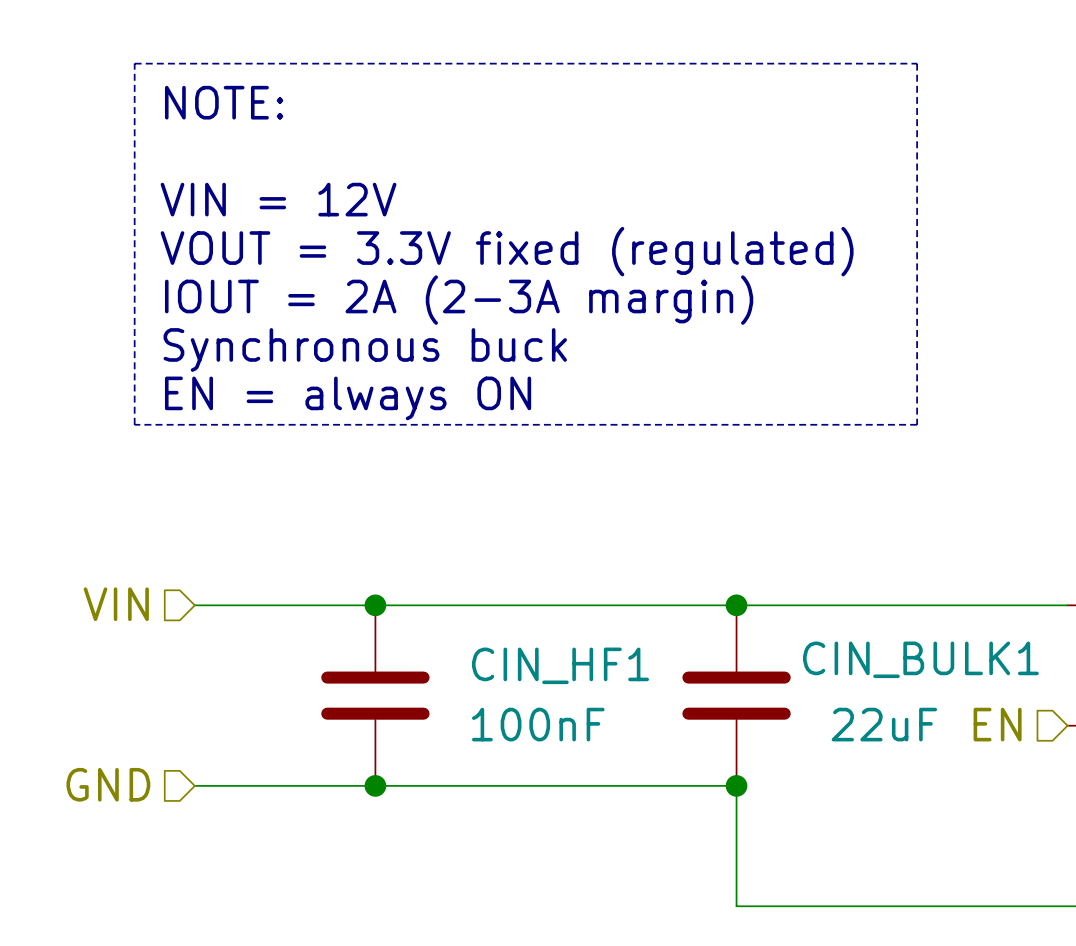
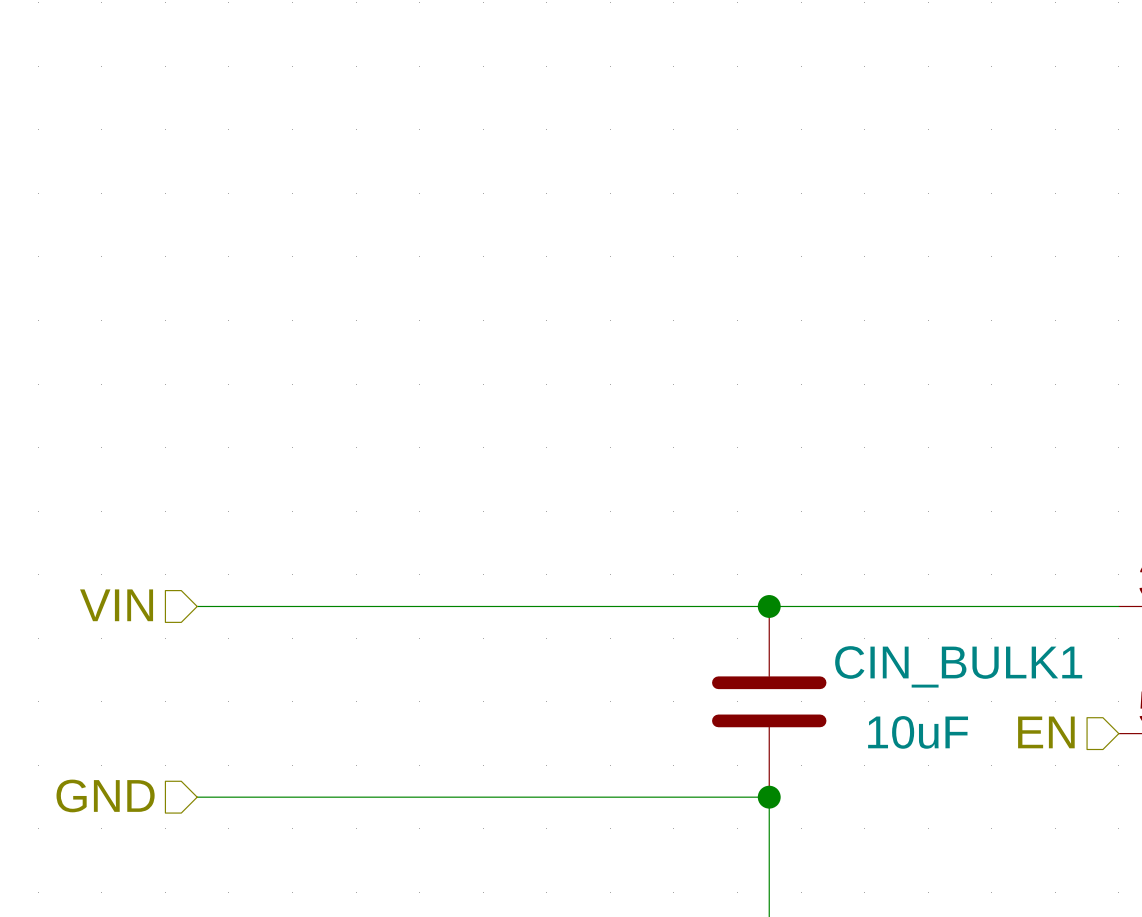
line: (134, 63) (917, 63) (917, 424) (134, 424) (134, 63) -> none
text: NOTE: (224, 102) -> none
text: VIN = 12V (278, 199) -> none
text: VOUT = 3.3V fixed (regulated) (507, 251) -> none
text: IOUT = 2A (2-3A margin) (459, 300) -> none
text: Synchronous buck (365, 349) -> none
text: EN = always ON (348, 398) -> none
junction: (375, 605) -> none
CIN_HF1: 100nF (375, 695) -> none
CIN_BULK1 value: 22uF (884, 724) -> 10uF (918, 732)
junction: (375, 785) -> none

